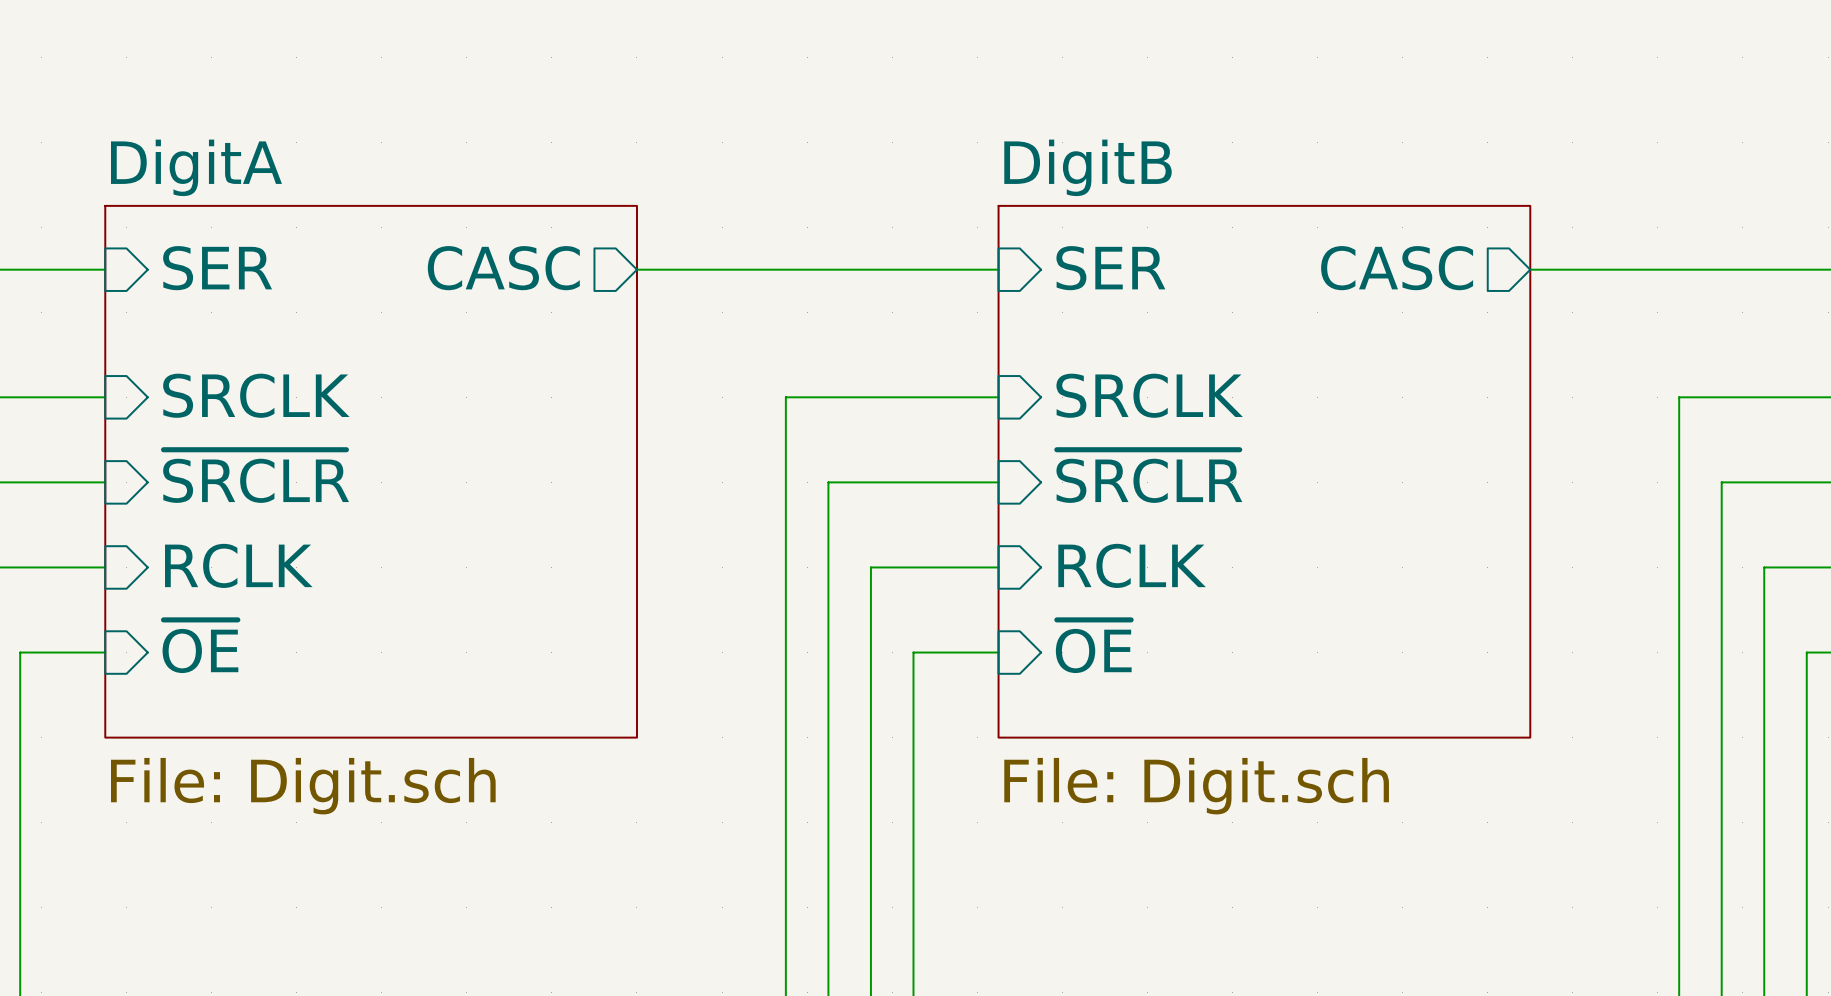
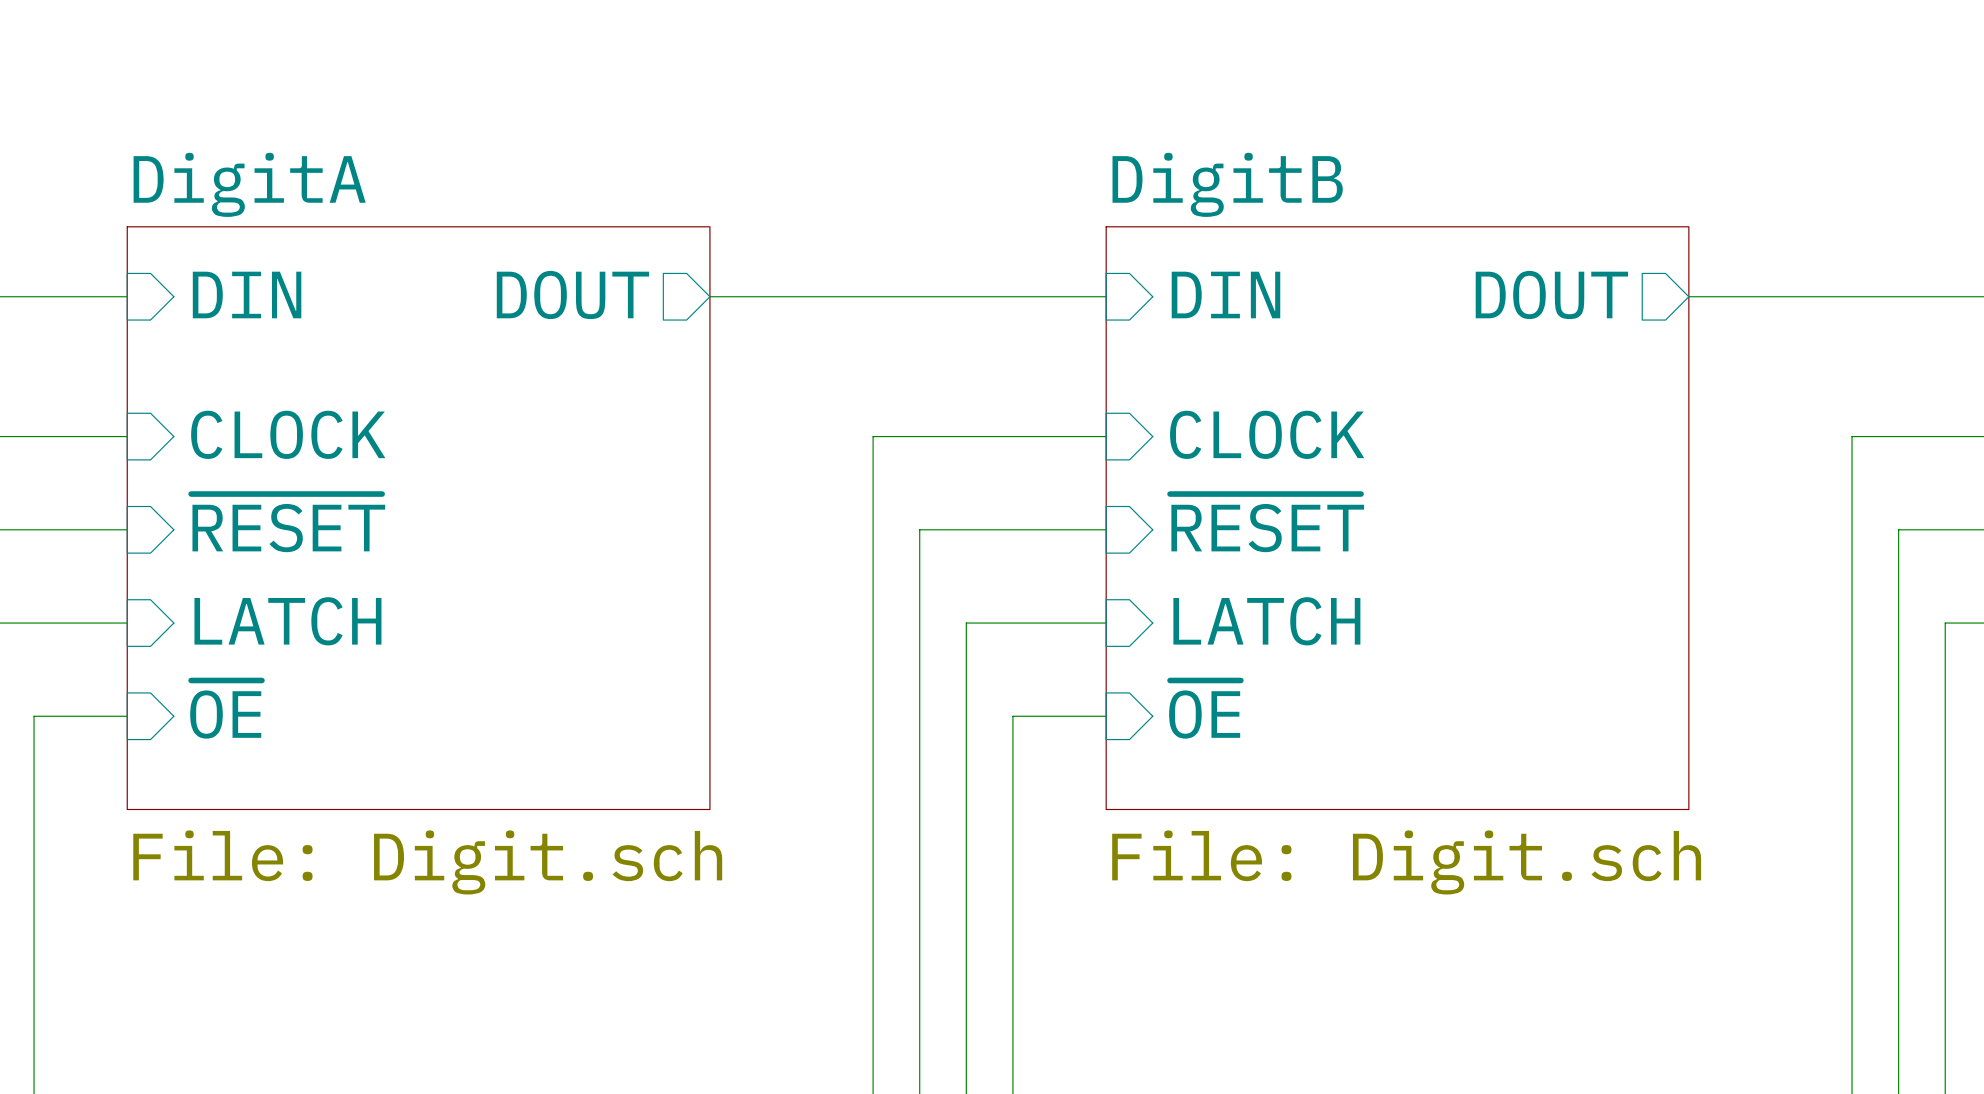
sheet pin: SER (217, 268) -> DIN (247, 294)
sheet pin: CASC (503, 268) -> DOUT (572, 294)
sheet pin: SER (1110, 268) -> DIN (1225, 294)
sheet pin: CASC (1397, 268) -> DOUT (1551, 294)
sheet pin: SRCLK (256, 395) -> CLOCK (288, 434)
sheet pin: SRCLK (1149, 395) -> CLOCK (1267, 434)
sheet pin: ~{SRCLR} (256, 476) -> ~{RESET} (288, 523)
sheet pin: ~{SRCLR} (1149, 476) -> ~{RESET} (1267, 523)
sheet pin: RCLK (238, 565) -> LATCH (287, 621)
sheet pin: RCLK (1132, 565) -> LATCH (1266, 621)

